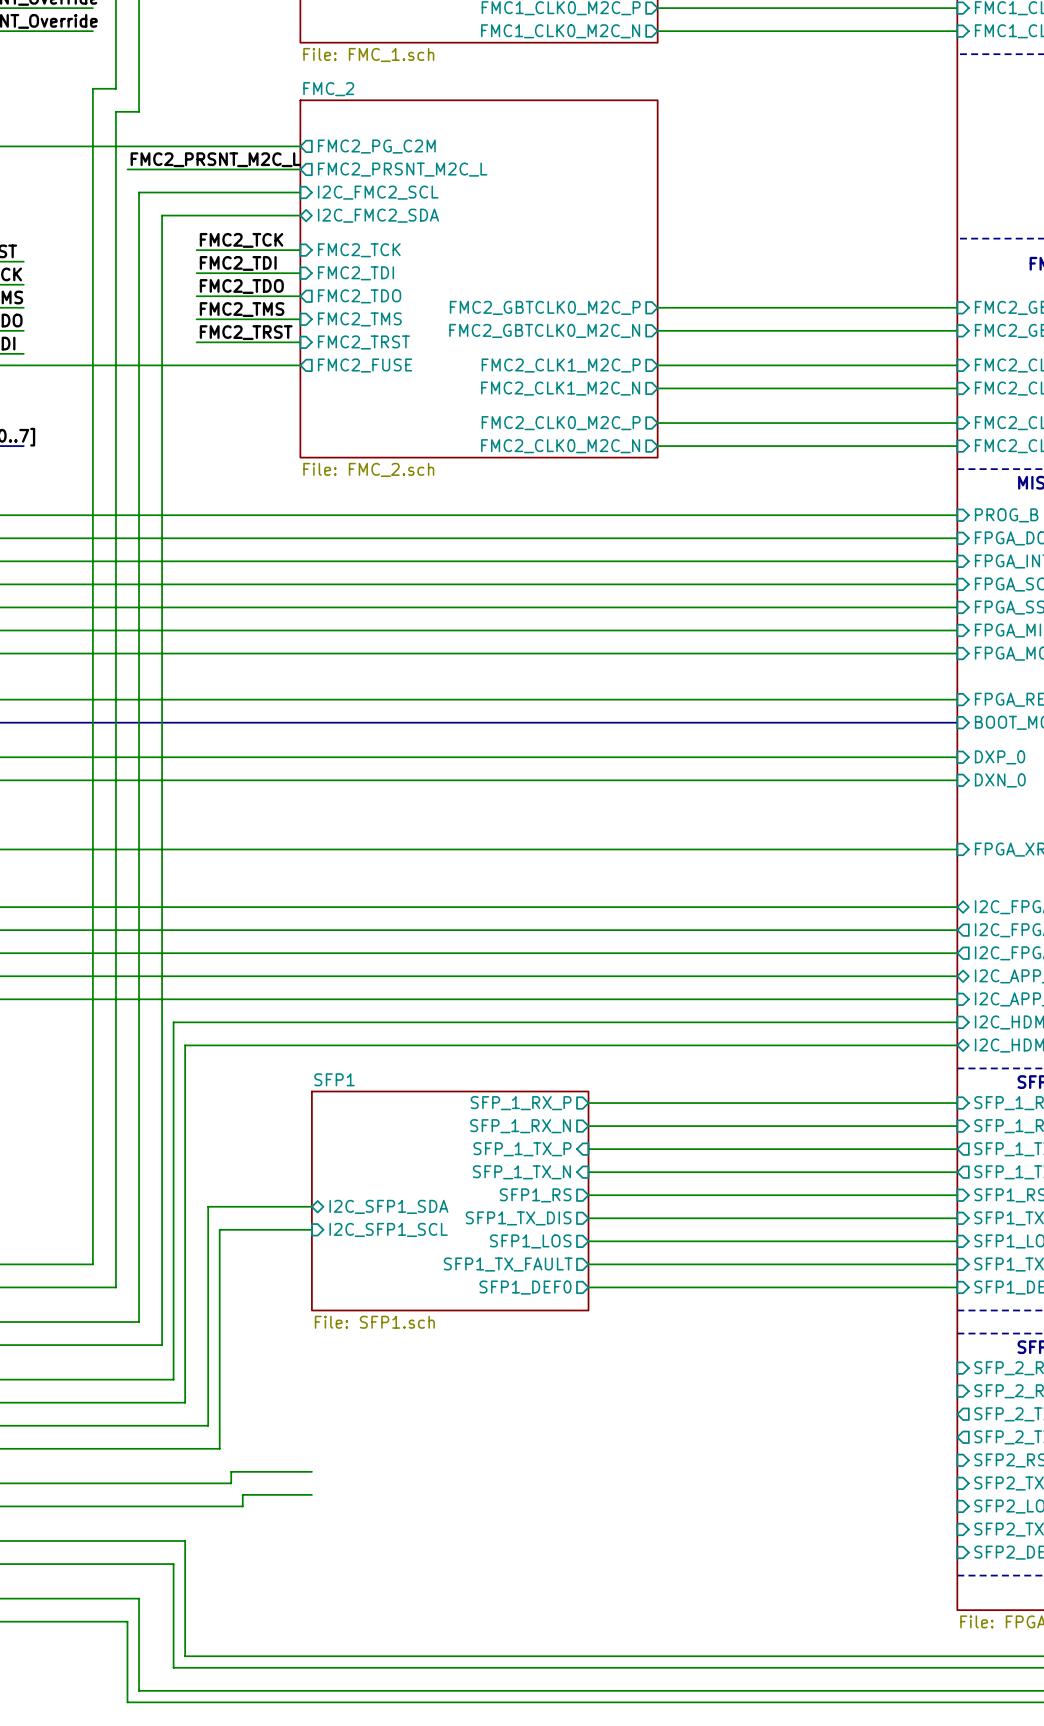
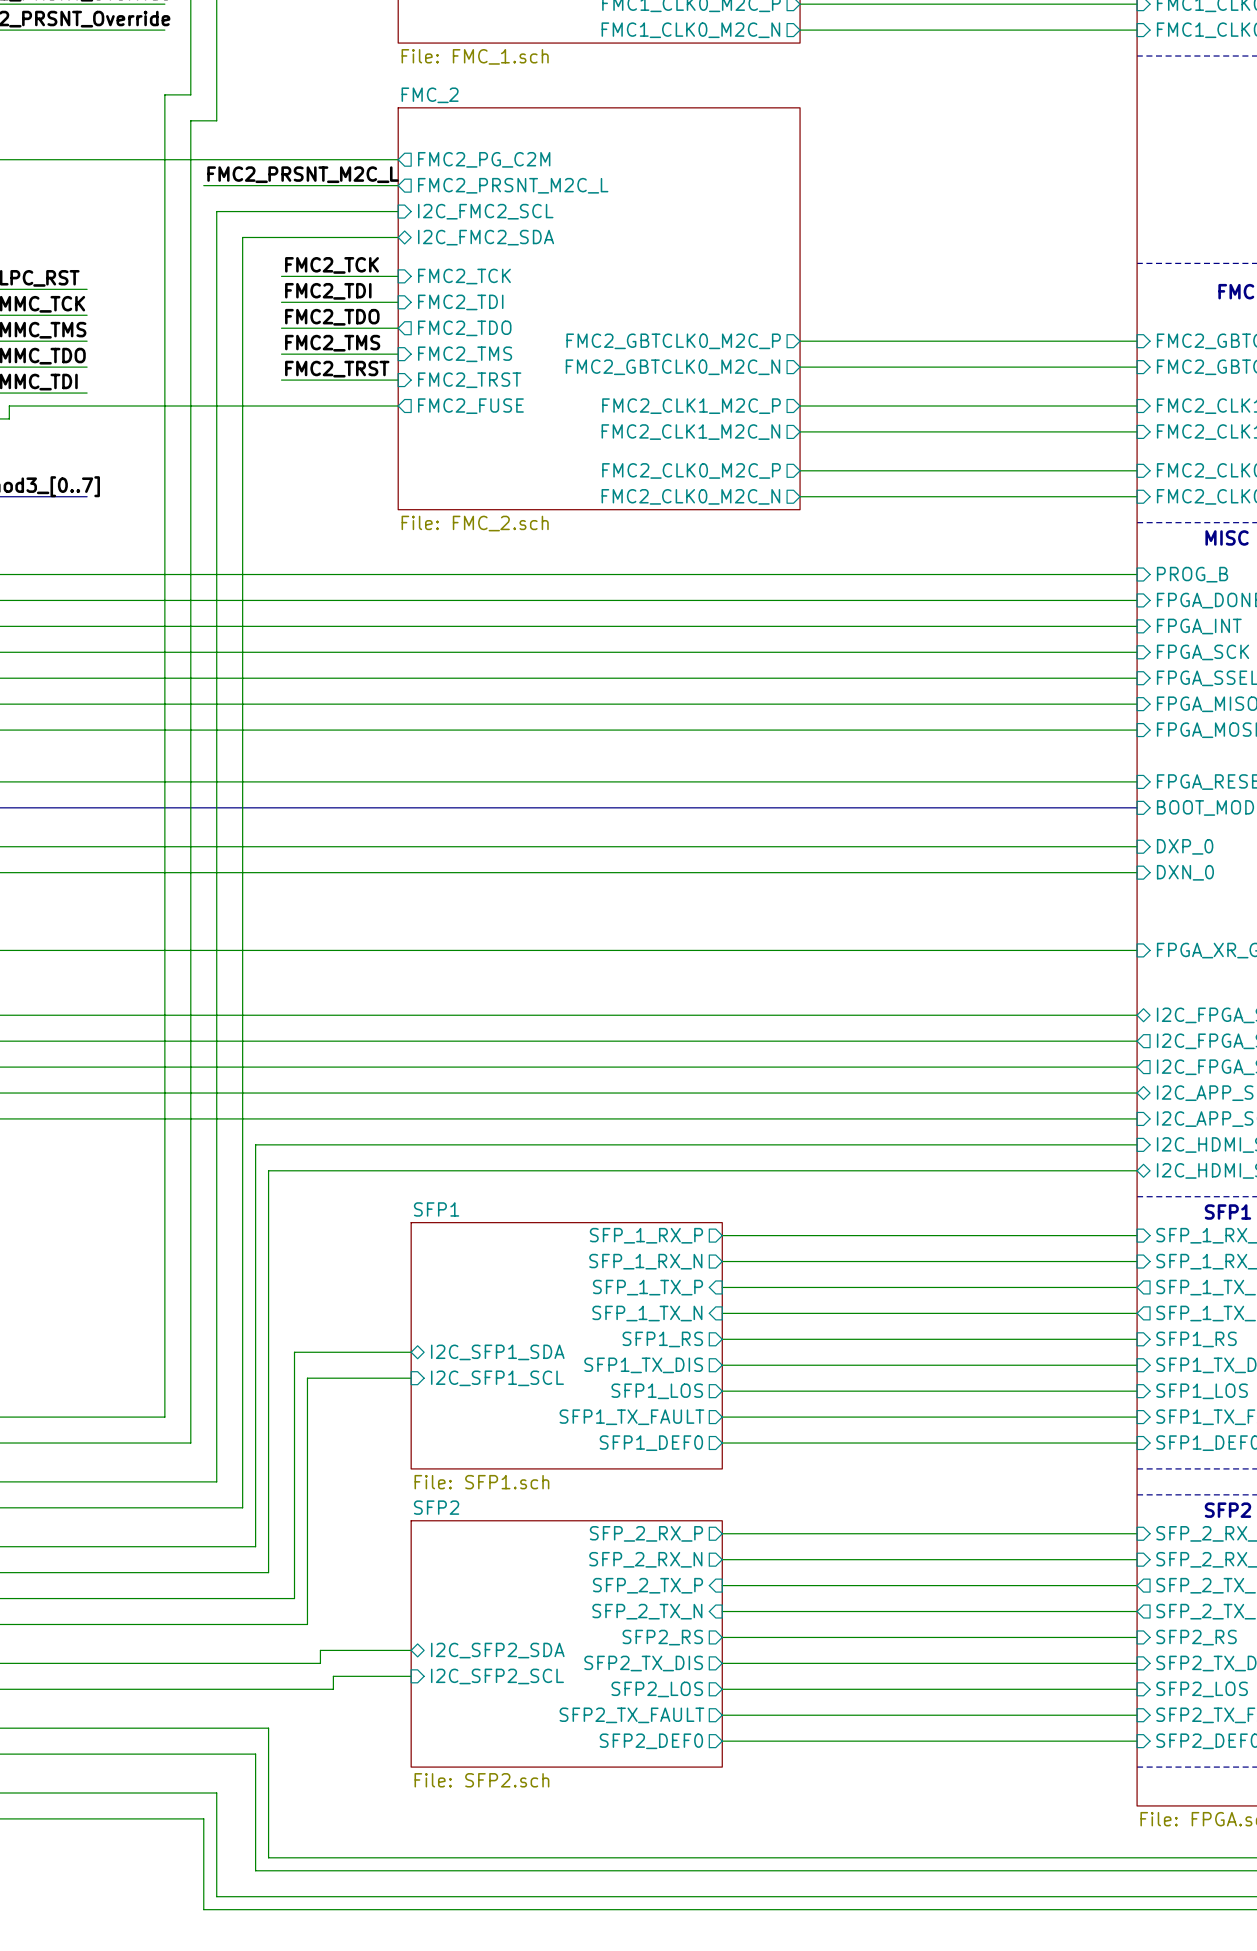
sheet pin: none -> SFP_2_RX_P (646, 1533)
wire: none -> (722, 1533) (1137, 1533)
sheet pin: none -> SFP_2_RX_N (645, 1559)
wire: none -> (722, 1559) (1137, 1559)
sheet pin: none -> SFP_2_TX_P (647, 1585)
wire: none -> (722, 1585) (1137, 1585)
sheet pin: none -> SFP_2_TX_N (647, 1611)
wire: none -> (722, 1611) (1137, 1611)
sheet pin: none -> SFP2_RS (662, 1637)
wire: none -> (722, 1637) (1137, 1637)
sheet SFP2: none -> File: SFP2.sch (566, 1643)
sheet pin: none -> I2C_SFP2_SDA (497, 1650)
sheet pin: none -> SFP2_TX_DIS (643, 1663)
wire: none -> (722, 1663) (1137, 1663)
sheet pin: none -> I2C_SFP2_SCL (497, 1676)
sheet pin: none -> SFP2_LOS (657, 1689)
wire: none -> (722, 1689) (1137, 1689)
sheet pin: none -> SFP2_TX_FAULT (631, 1715)
wire: none -> (722, 1715) (1137, 1715)
sheet pin: none -> SFP2_DEF0 (651, 1741)
wire: none -> (722, 1741) (1137, 1741)

